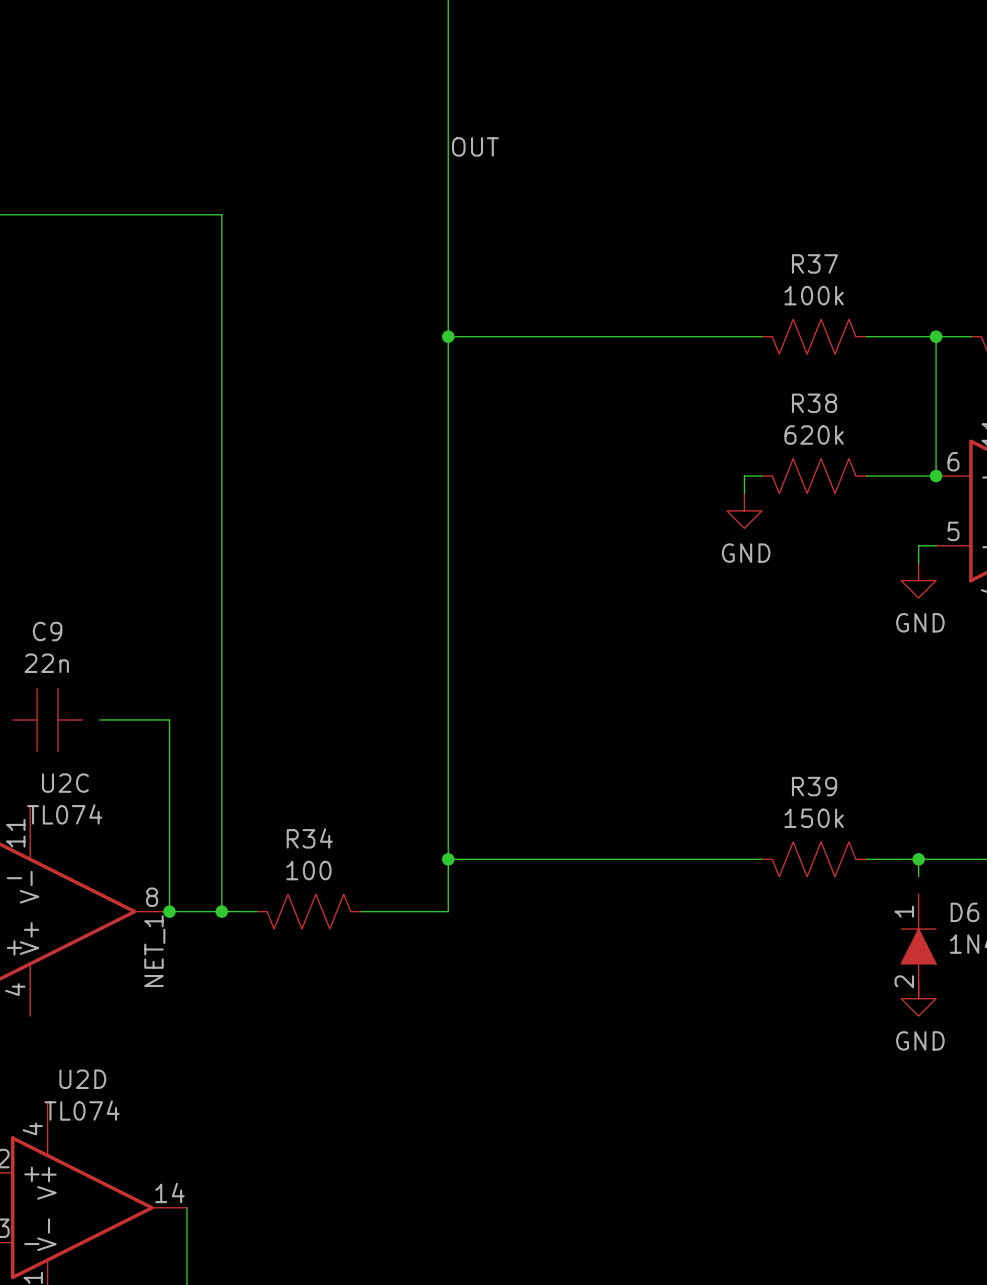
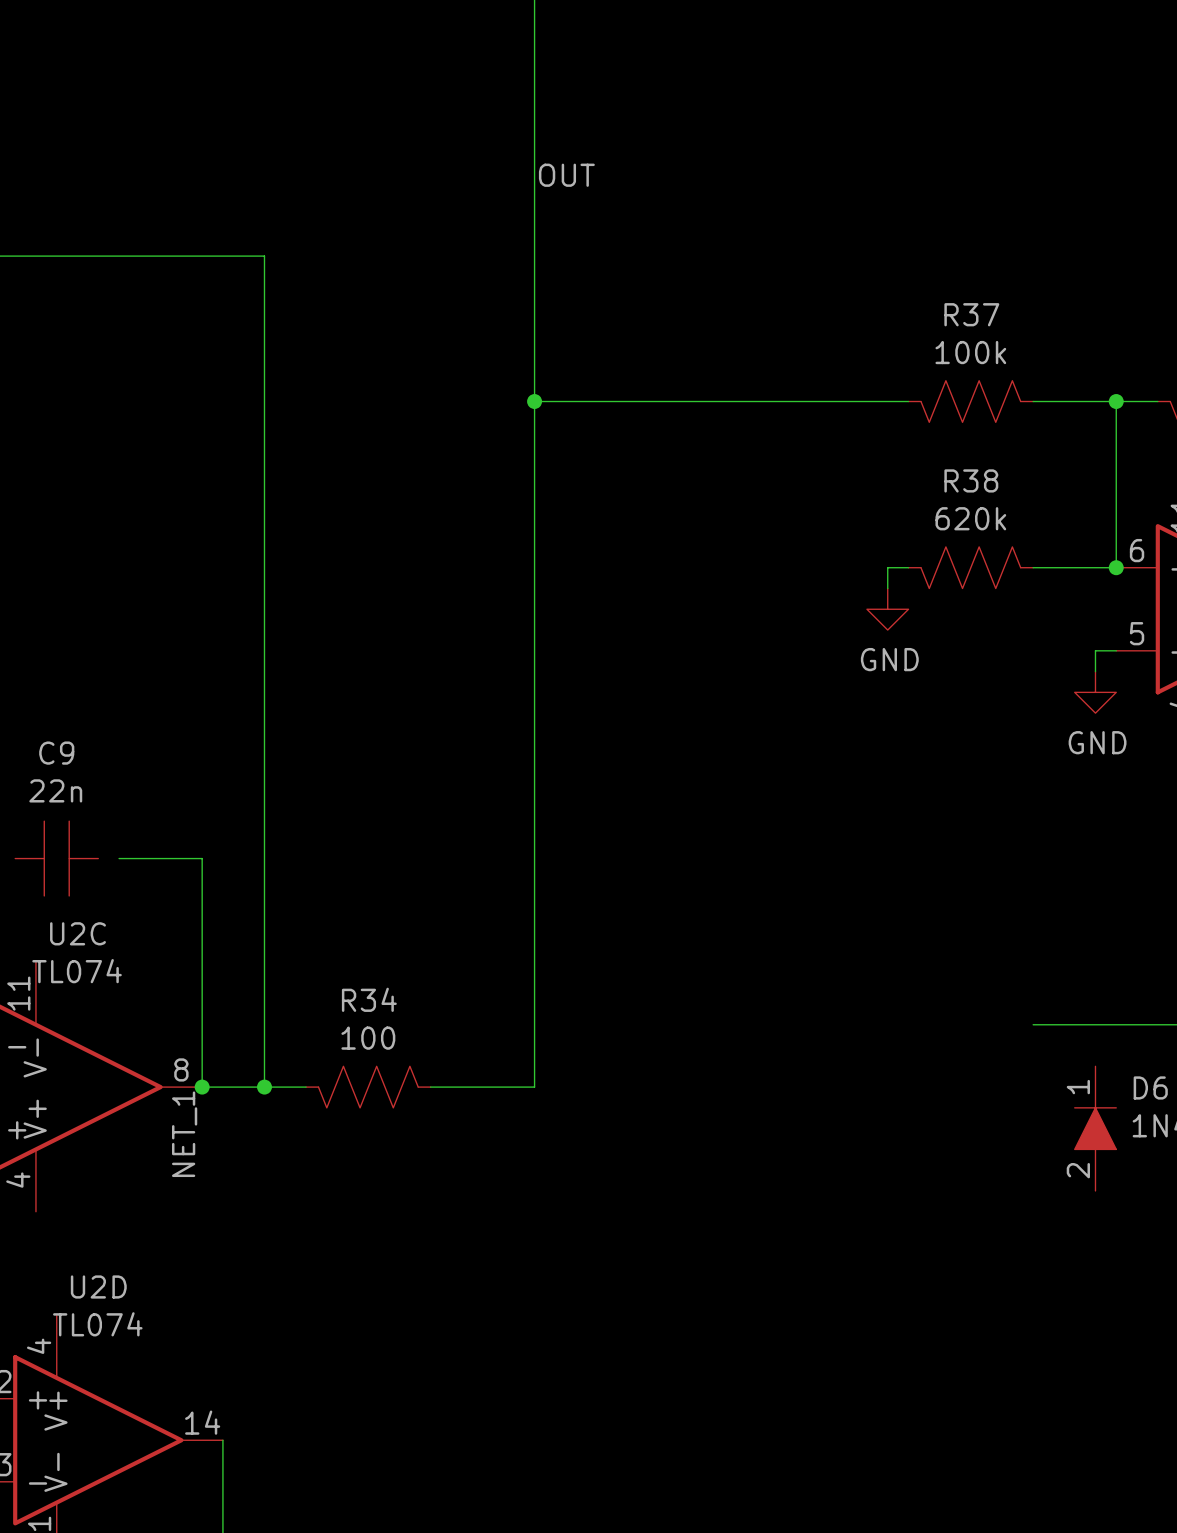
wire: (448, 859) (761, 859) -> none
junction: (448, 859) -> none
R39: 150k (814, 859) -> none
wire: (918, 859) (918, 876) -> none
junction: (918, 859) -> none
power symbol: GND (918, 998) -> none

